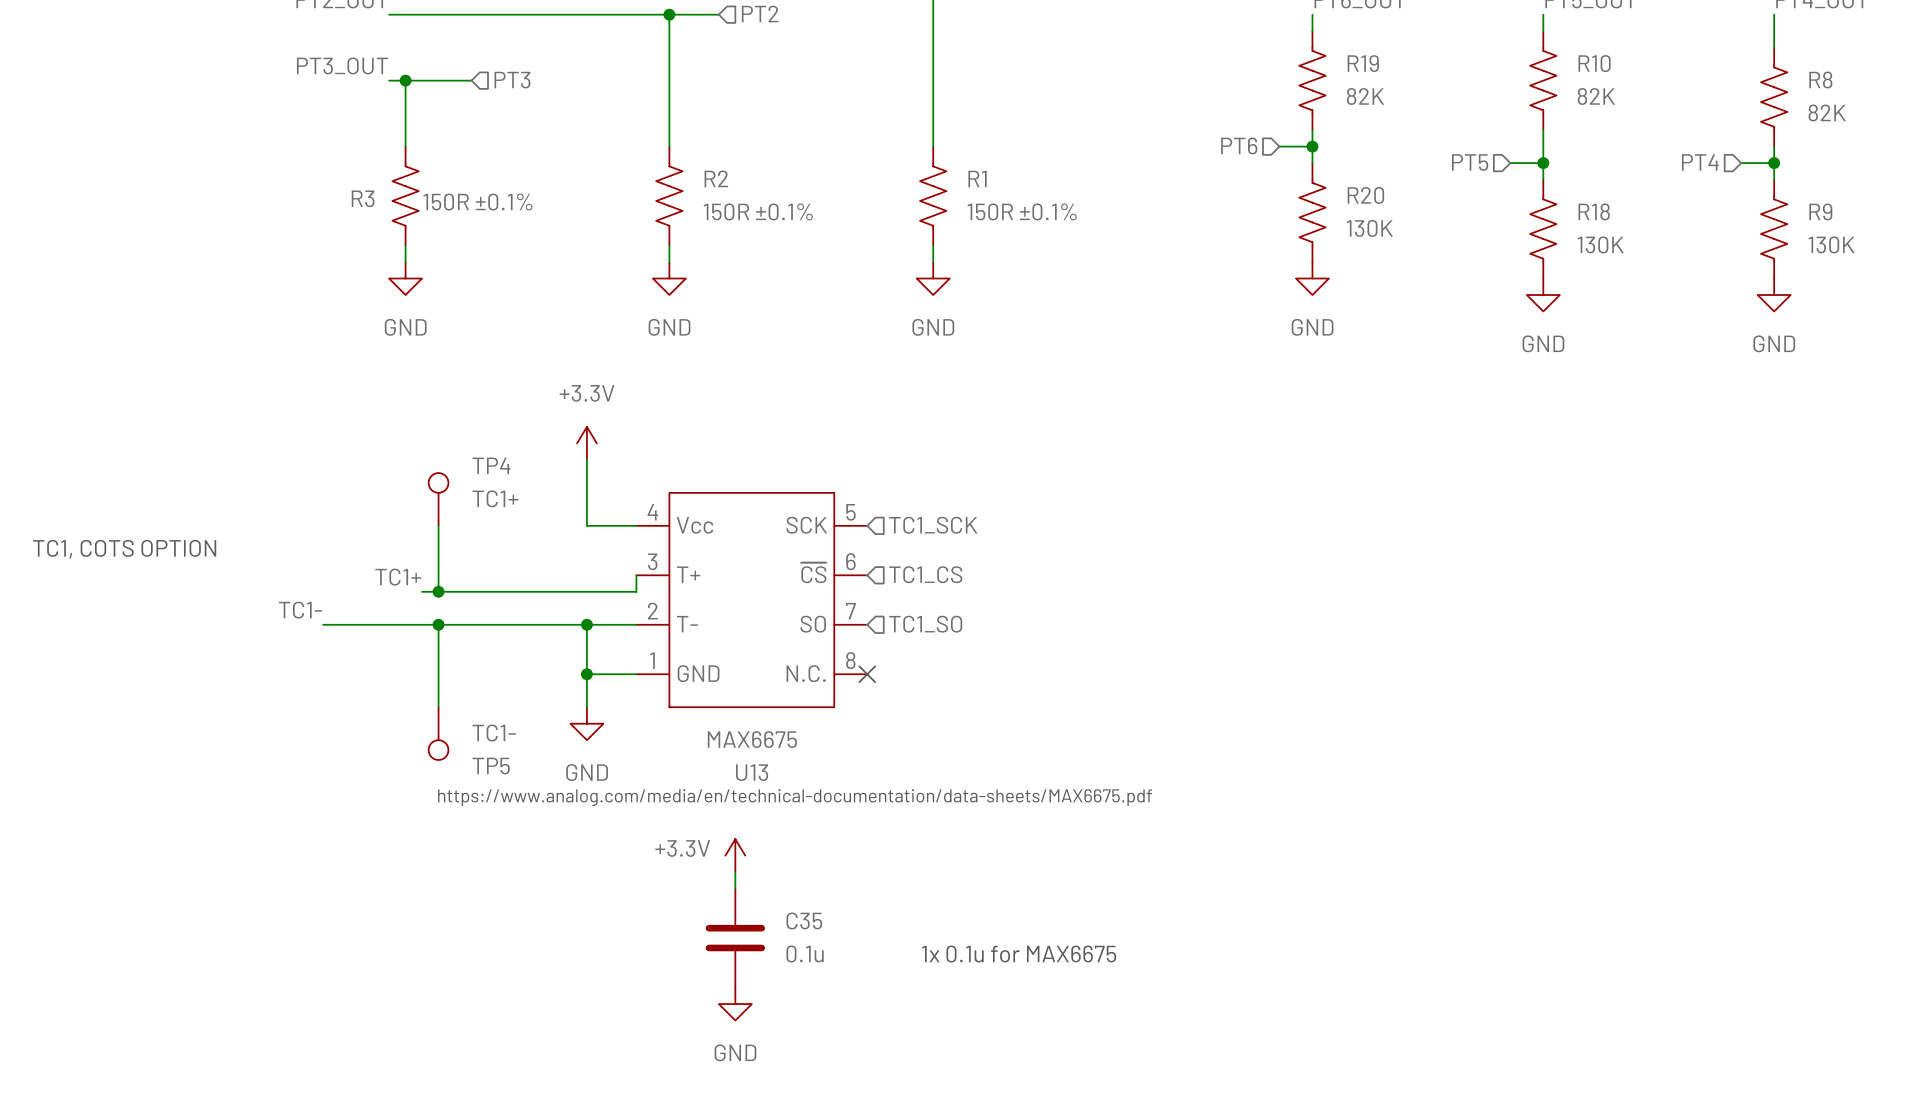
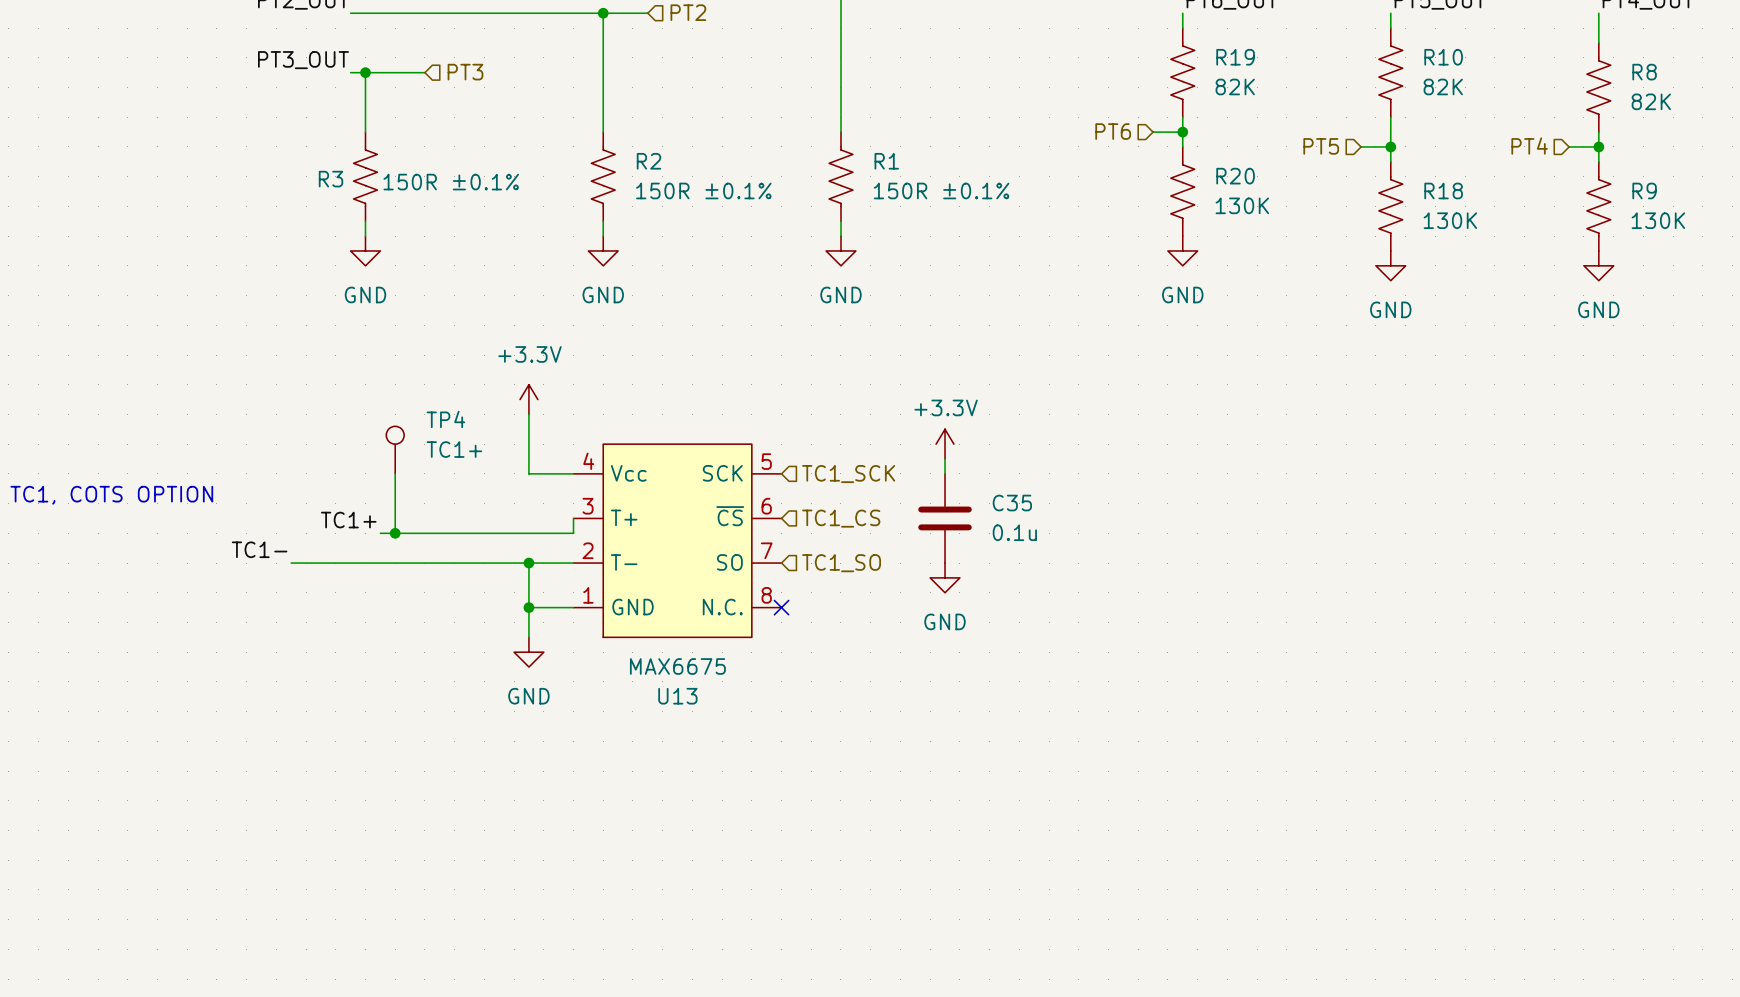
power symbol: none -> +3.3V (945, 444)
wire: none -> (945, 459) (945, 473)
wire: (438, 624) (438, 707) -> none
junction: (438, 624) -> none
power symbol: none -> GND (945, 577)
TP5: TC1- (438, 733) -> none
text: https://www.analog.com/media/en/technical-documentation/data-sheets/MAX6675.pdf (795, 797) -> none
power symbol: +3.3V (735, 855) -> none
wire: (735, 872) (735, 888) -> none
C35 position: (735, 938) -> (945, 518)
text: 1x 0.1u for MAX6675 (1019, 954) -> none
power symbol: GND (735, 1004) -> none

